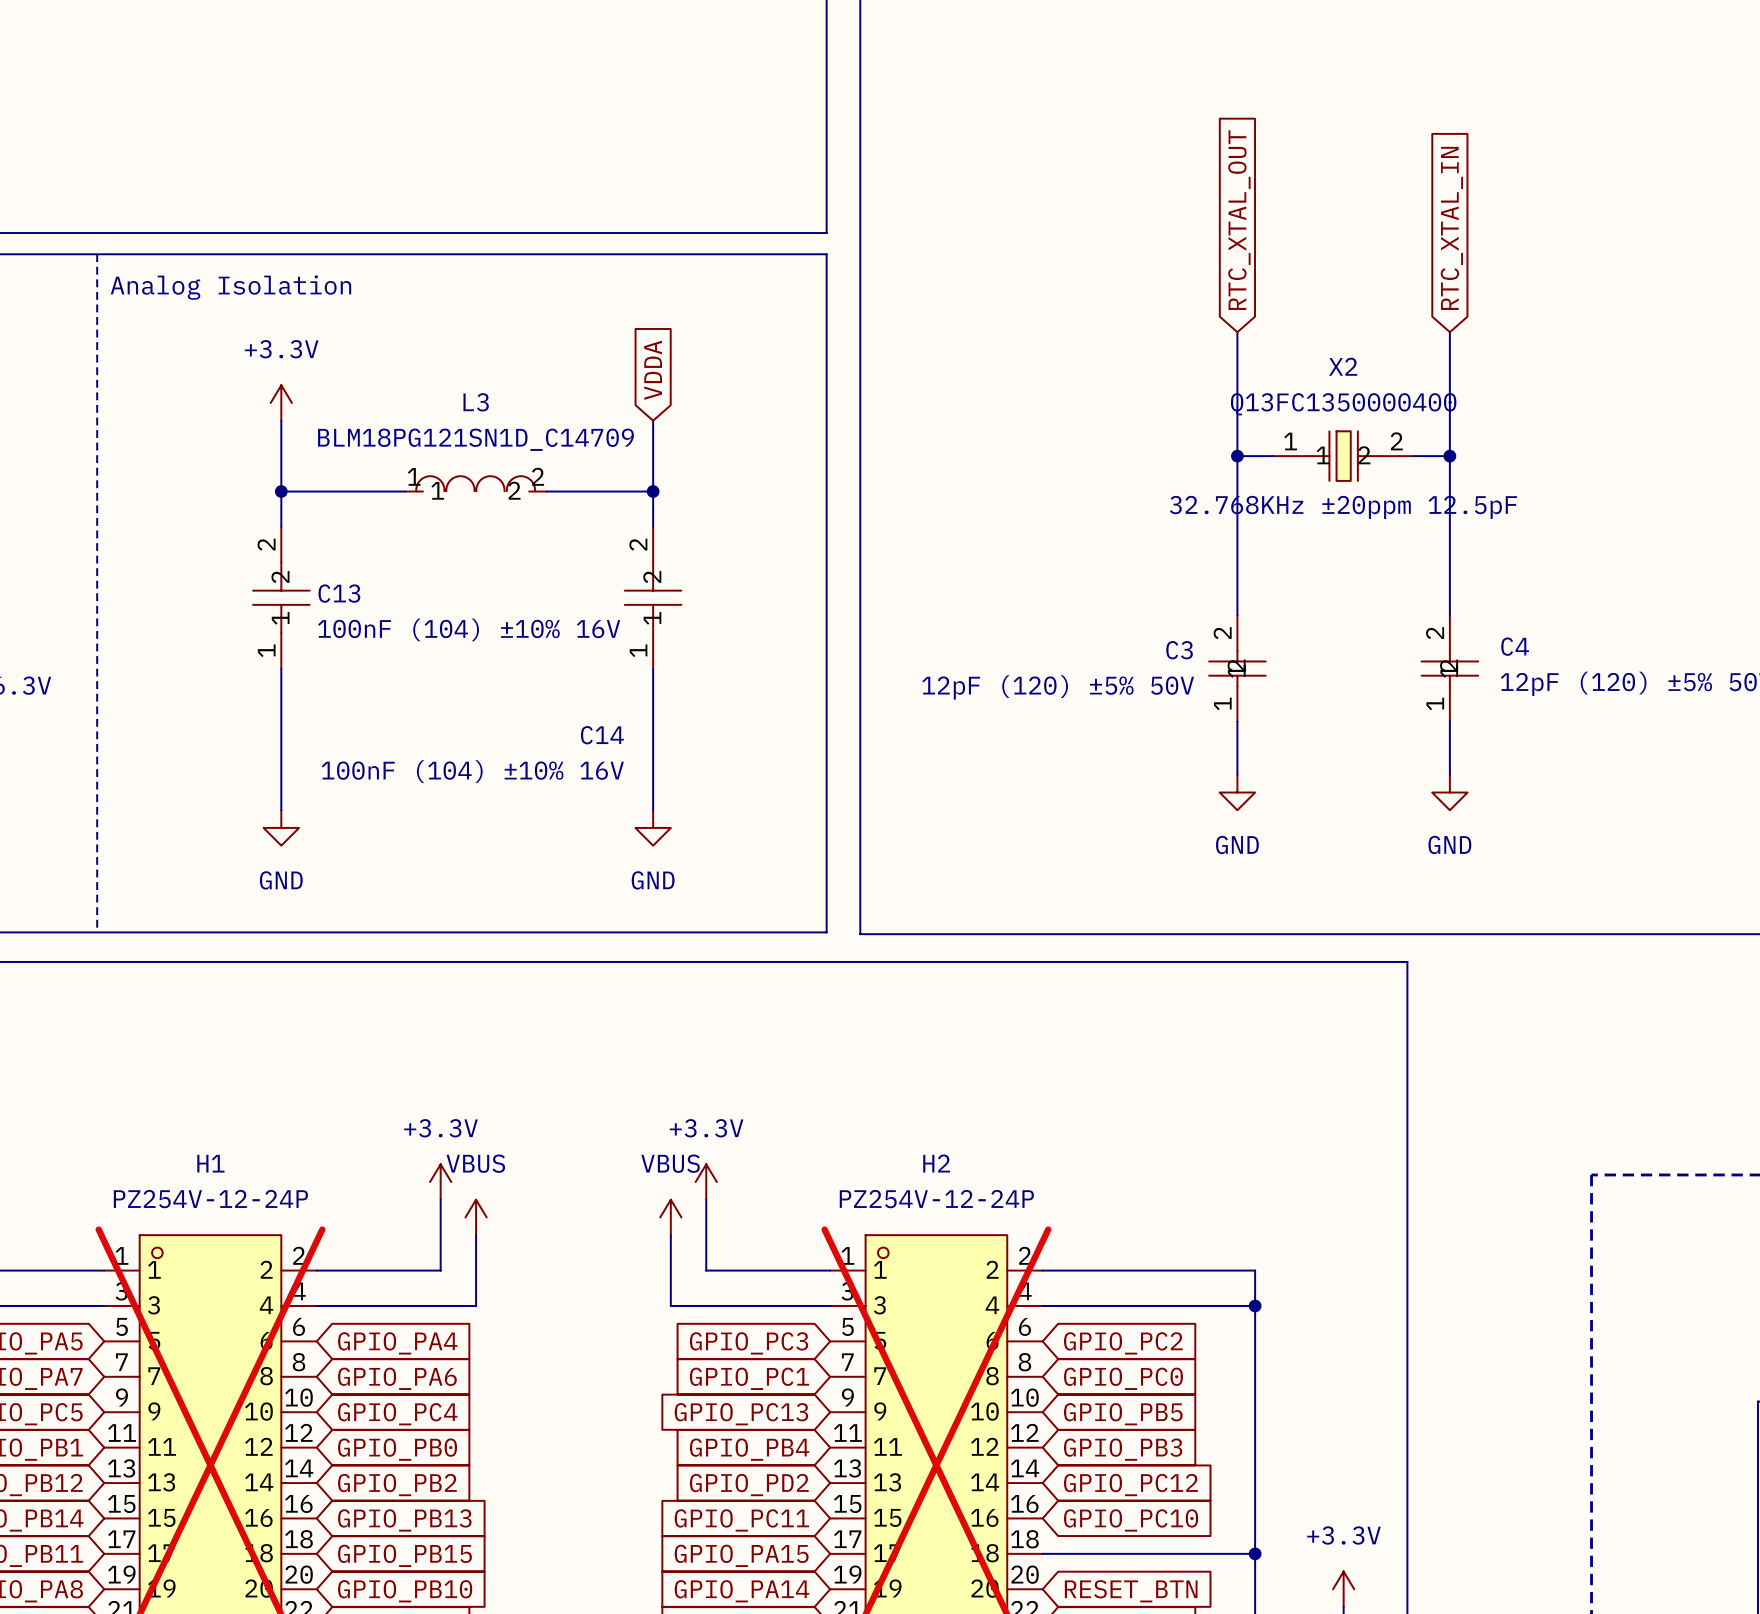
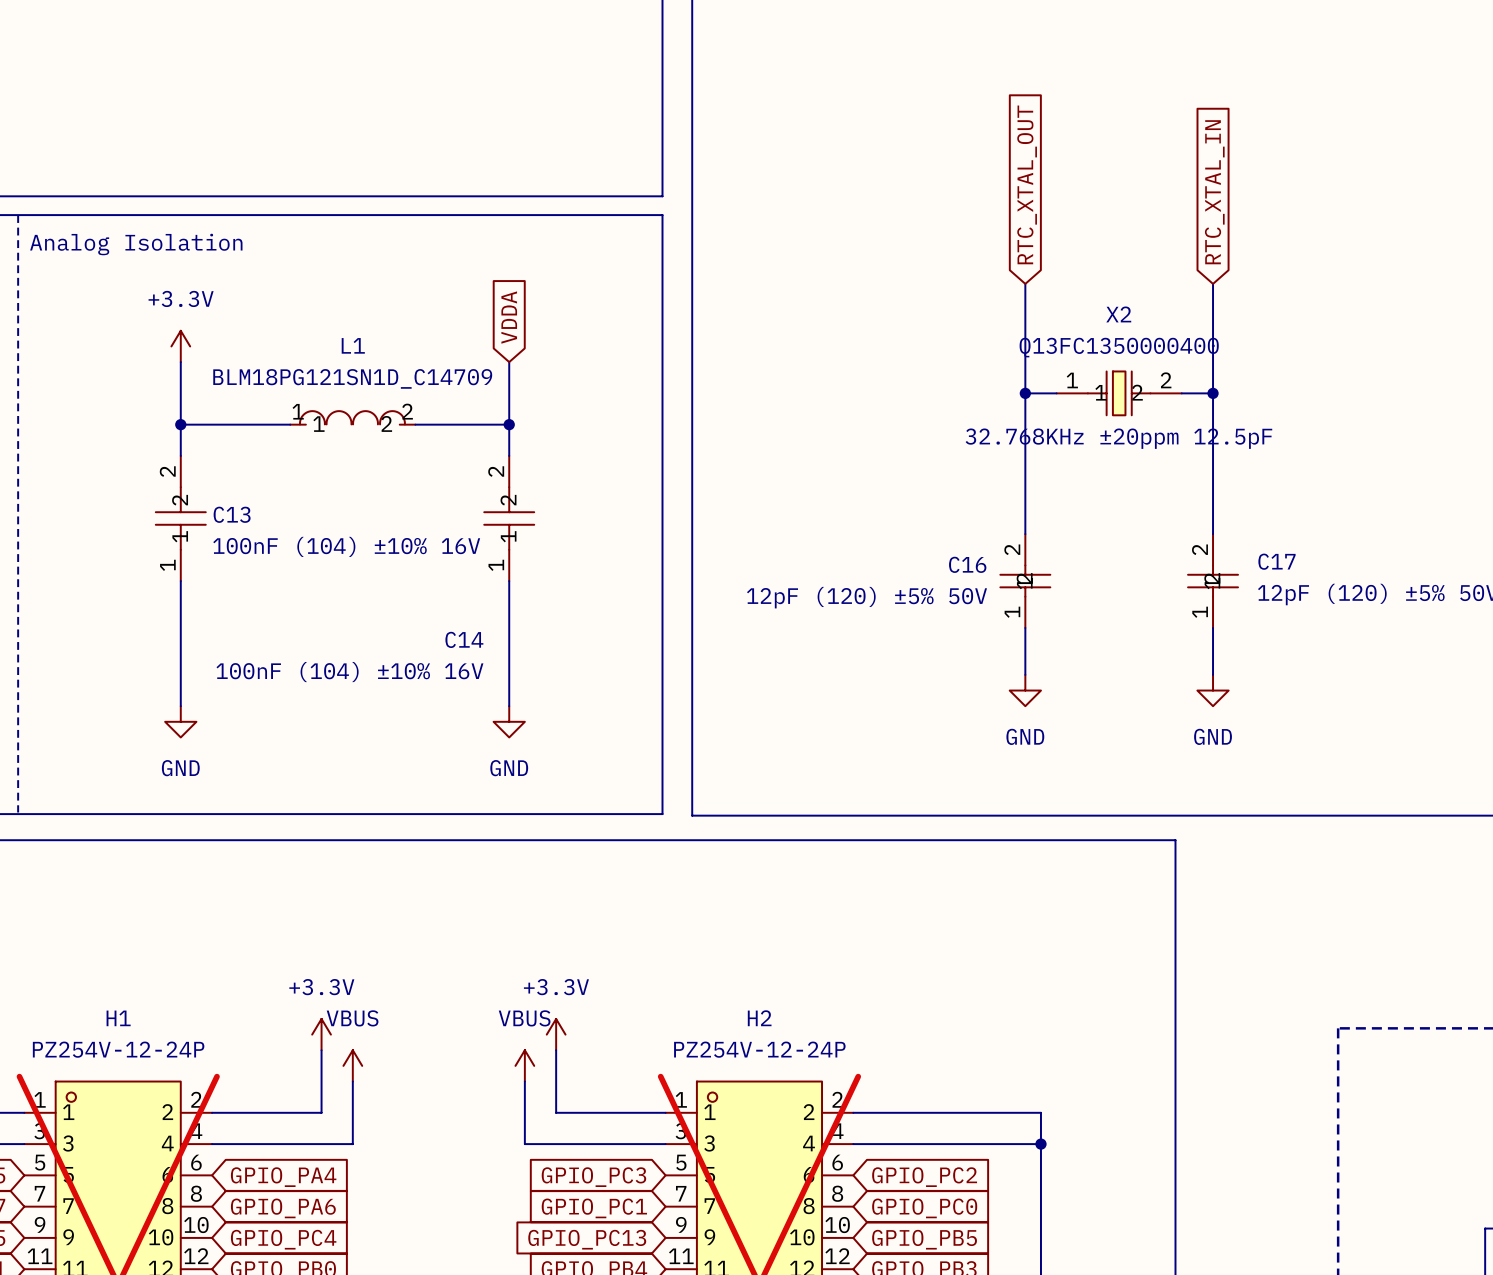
L3 name: L3 (476, 402) -> L1 (353, 345)
C4 name: C4 (1515, 646) -> C17 (1276, 561)
C3 name: C3 (1179, 650) -> C16 (967, 564)

